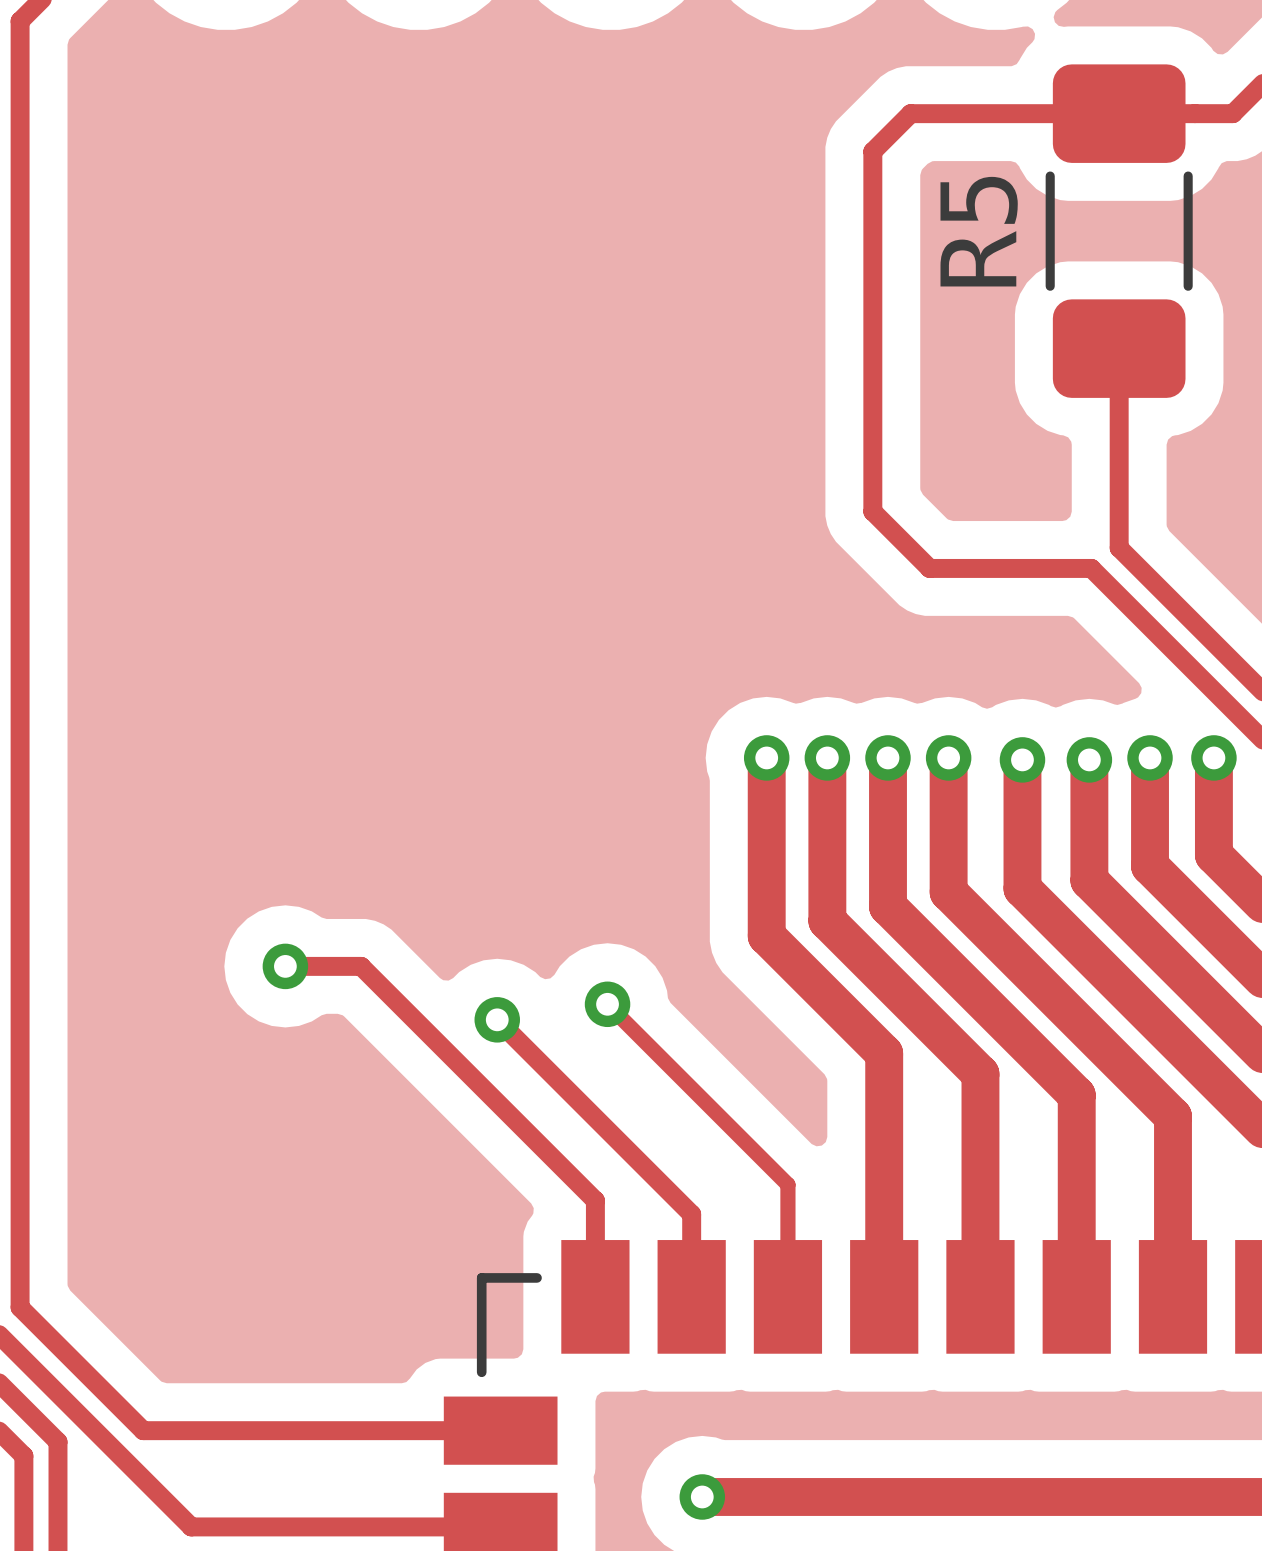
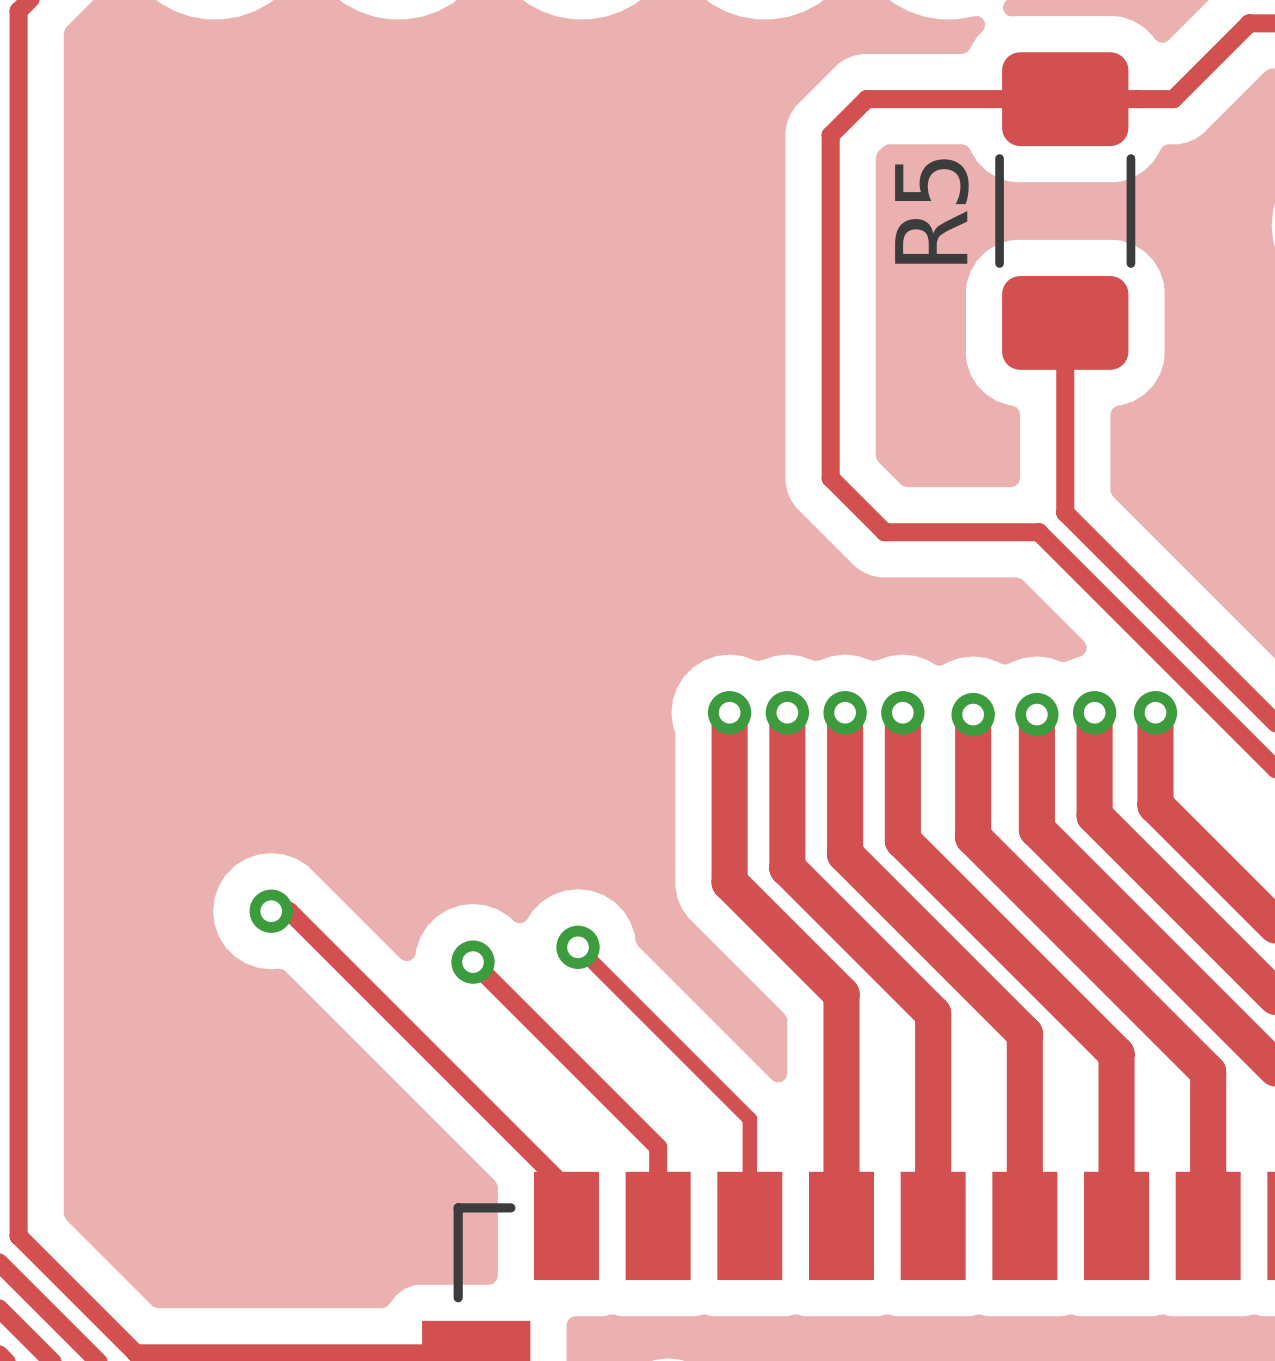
track: (304, 966) (361, 966) (595, 1200) (595, 1257) -> (289, 911) (566, 1188)

